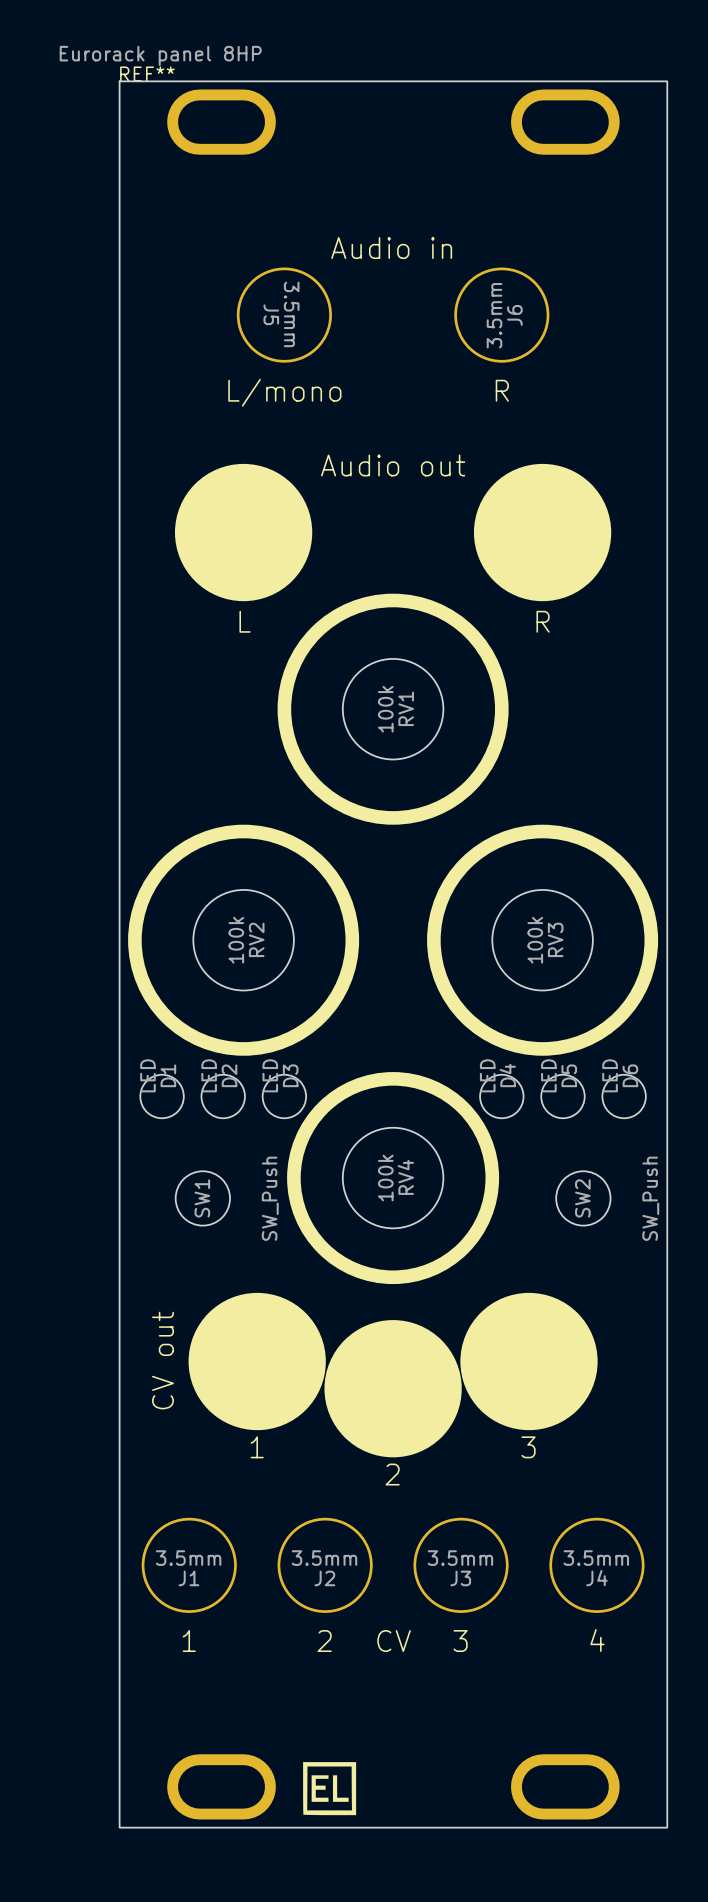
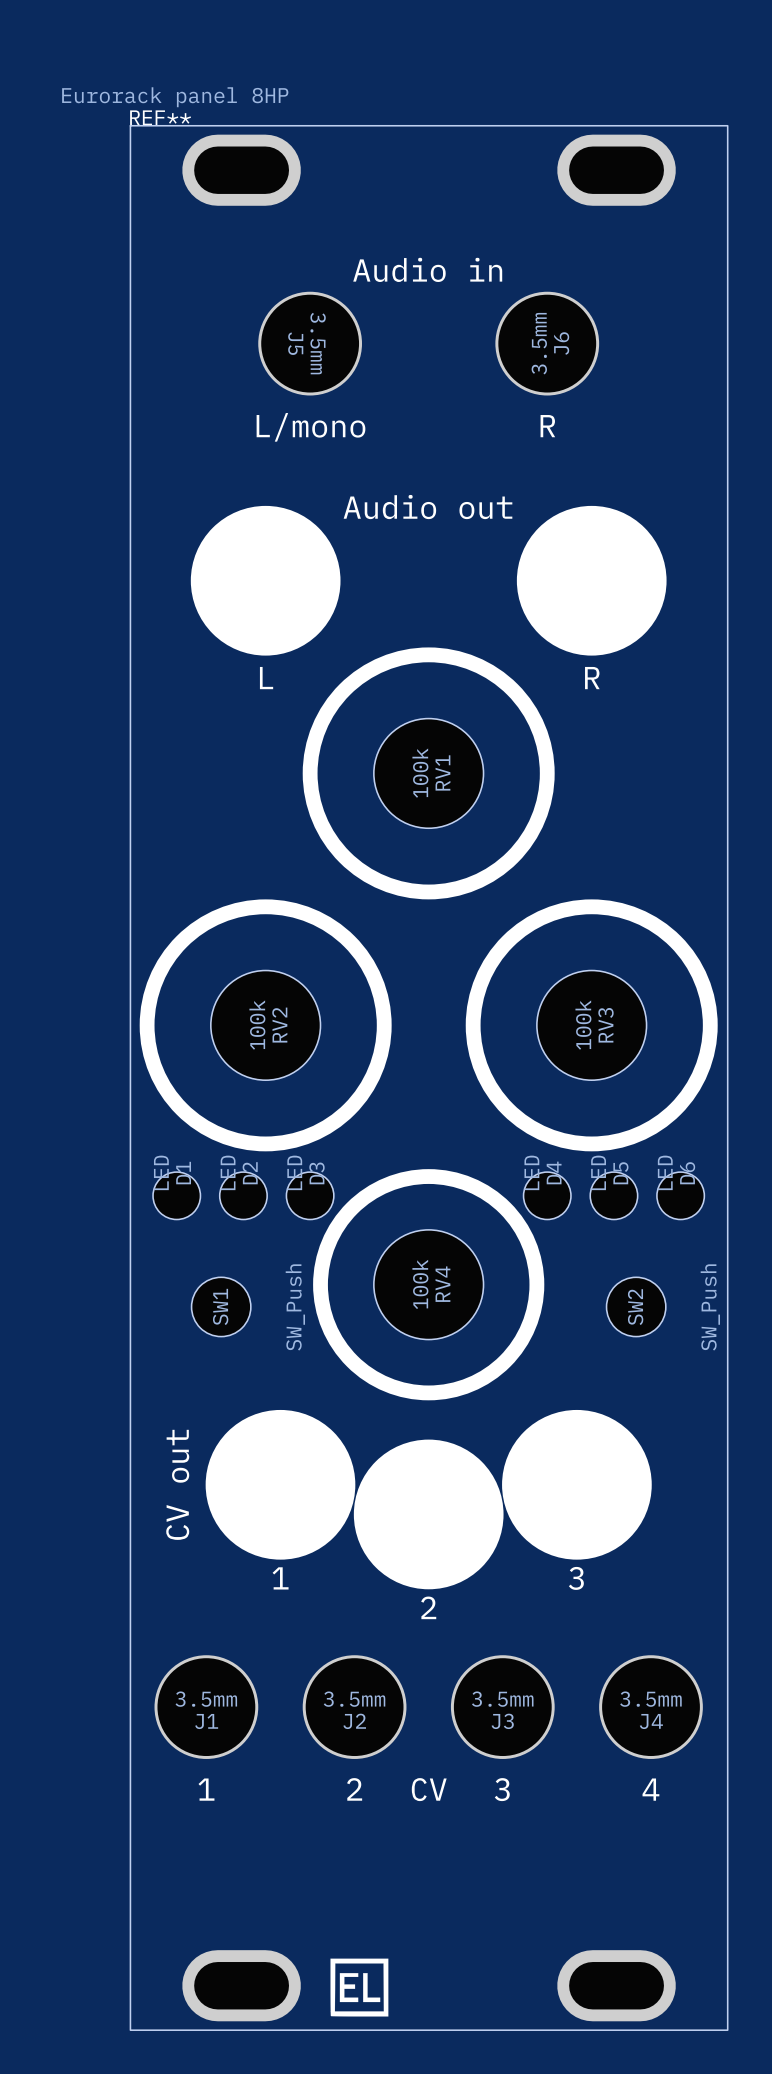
REF** position: (393, 954) -> (429, 1077)
drawing position: (329, 1788) -> (359, 1987)

